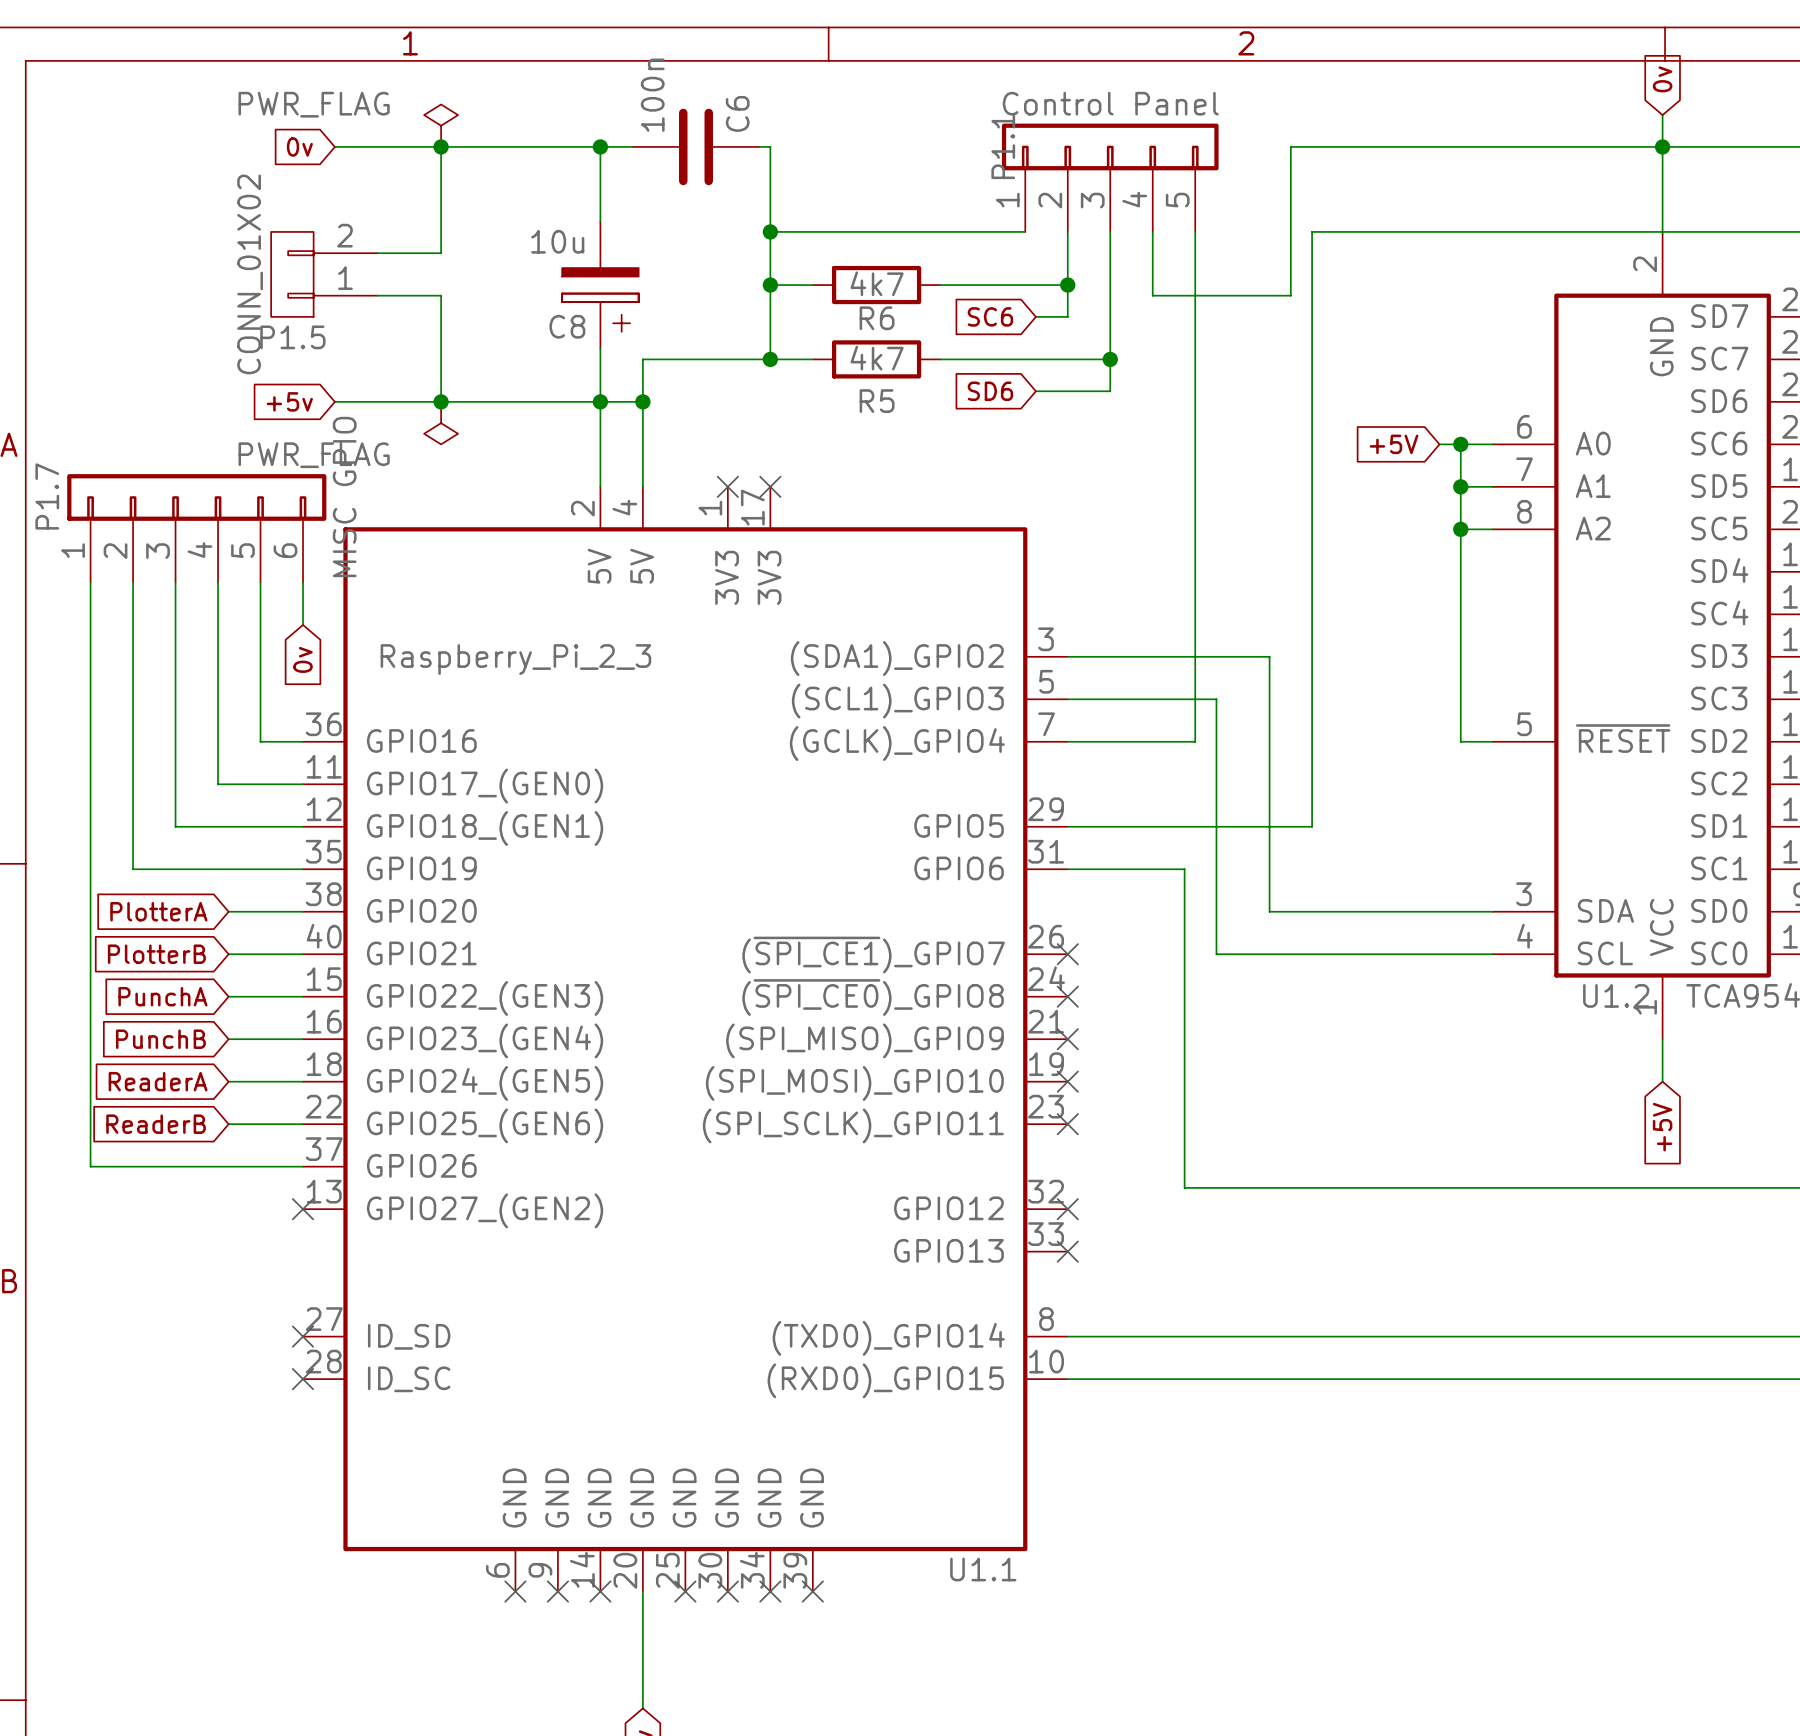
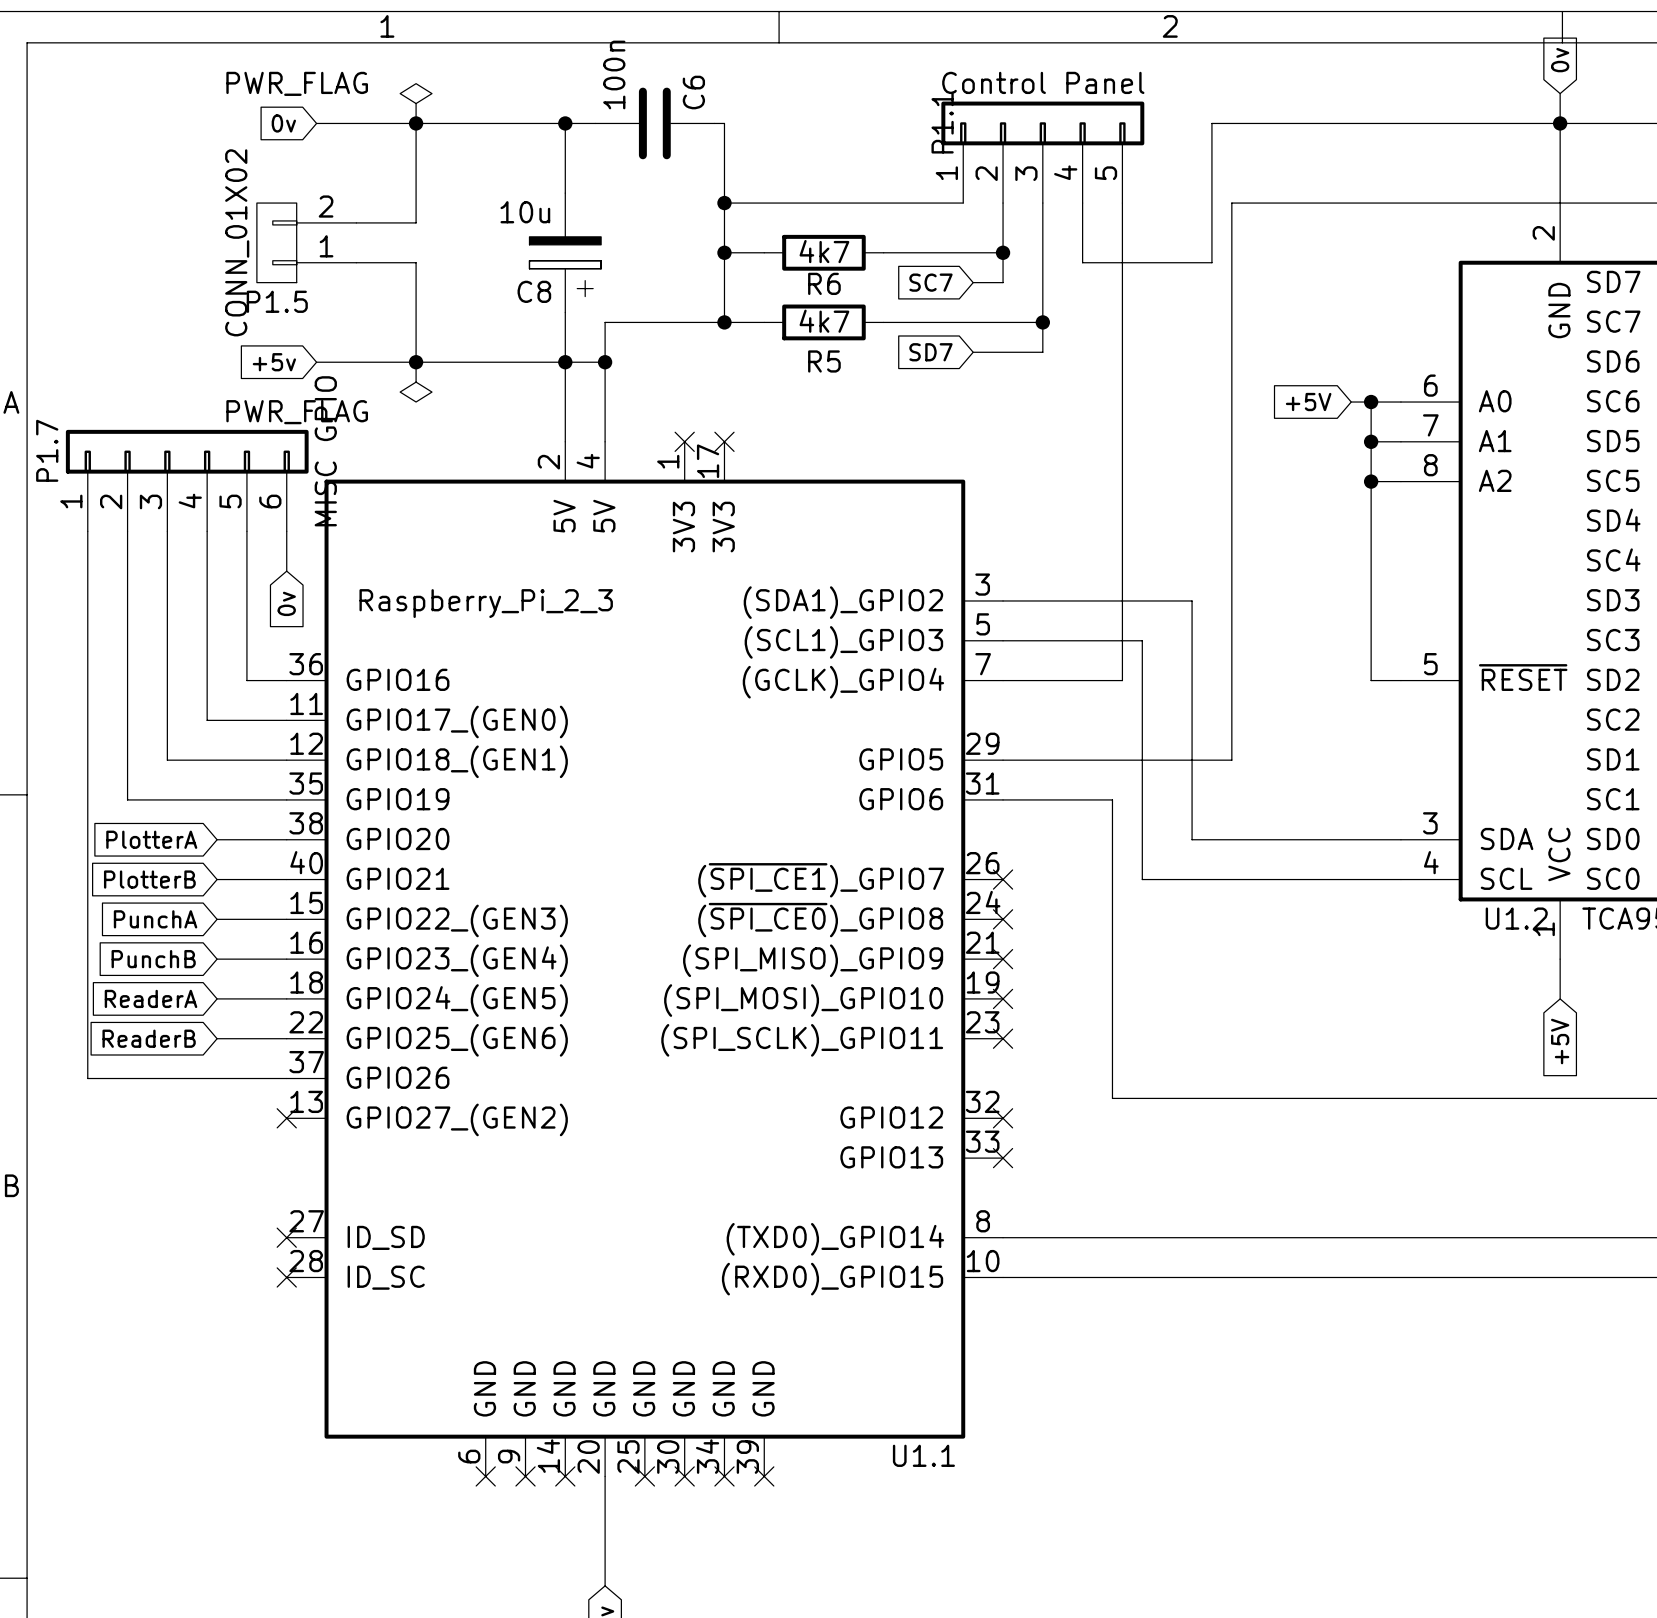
global label: SC6 (990, 316) -> SC7 (930, 282)
global label: SD6 (990, 391) -> SD7 (930, 352)

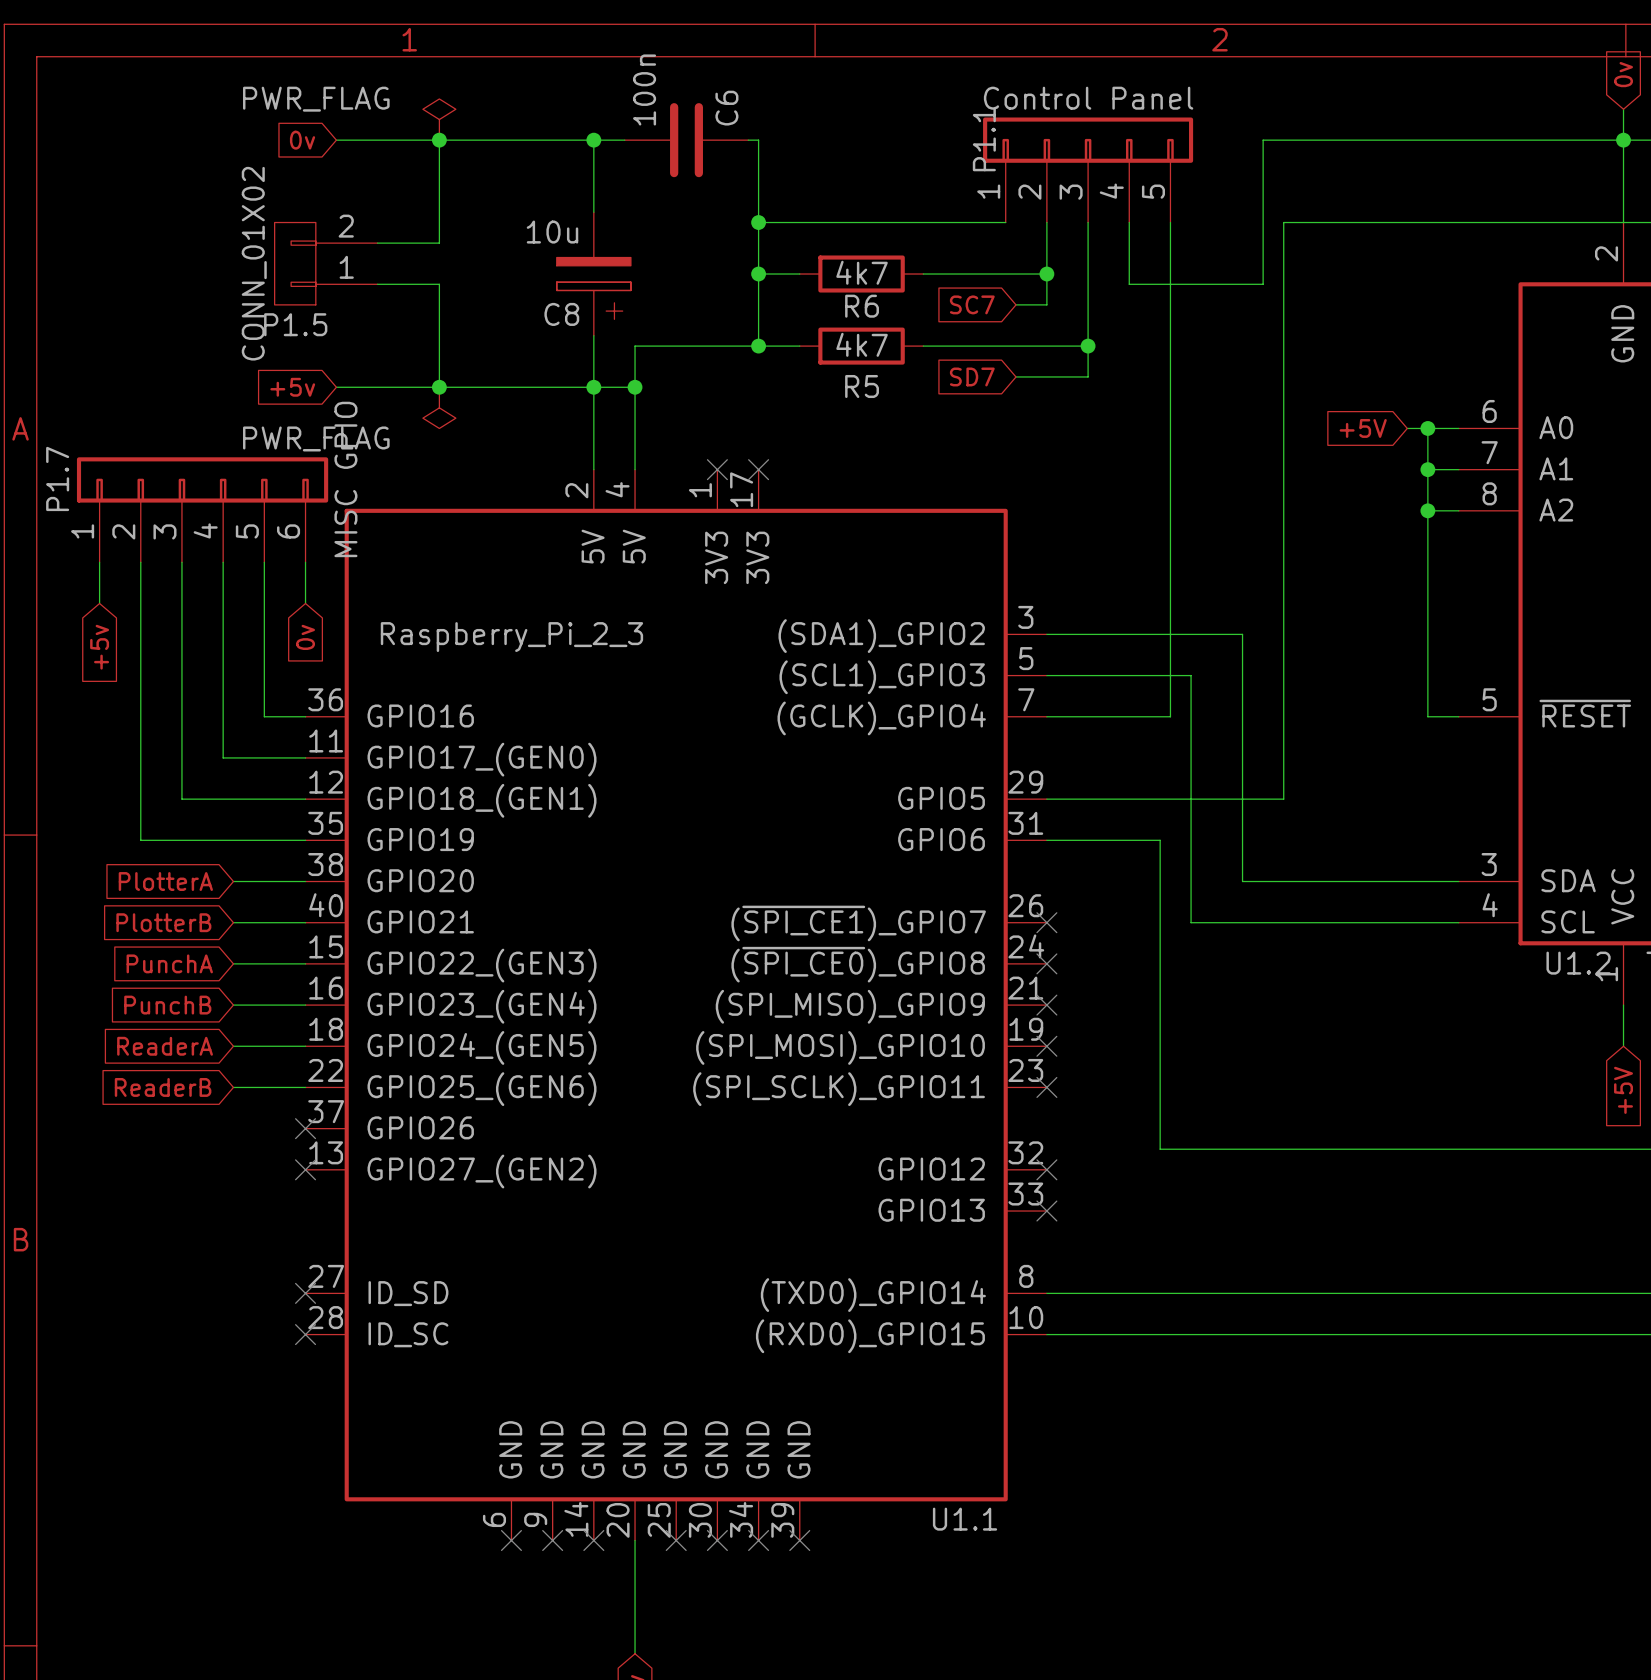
wire: (87, 571) (87, 1078) (286, 1078) -> none
global label: none -> +5v (99, 647)
no-connect mark: none -> (305, 1128)

